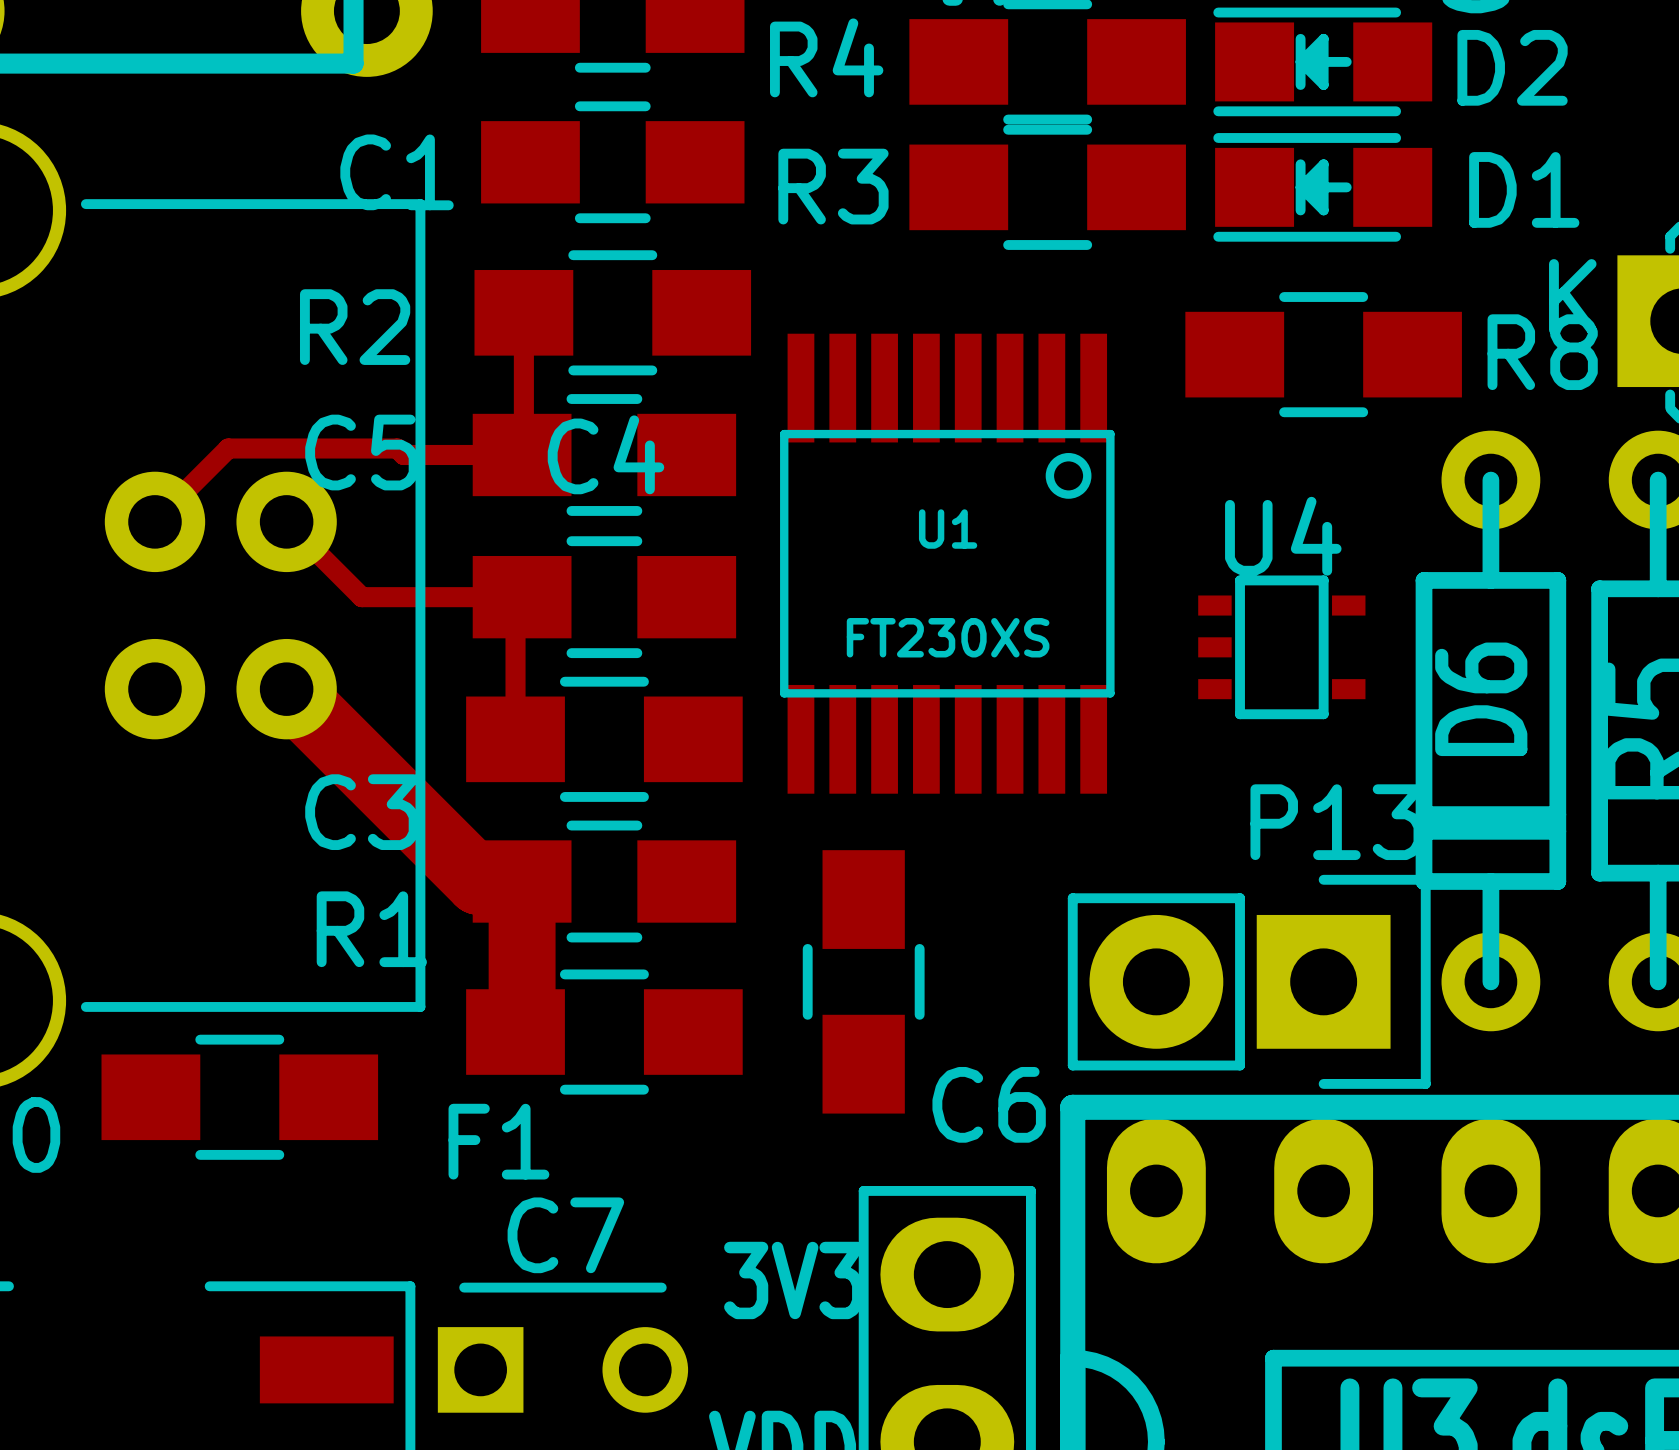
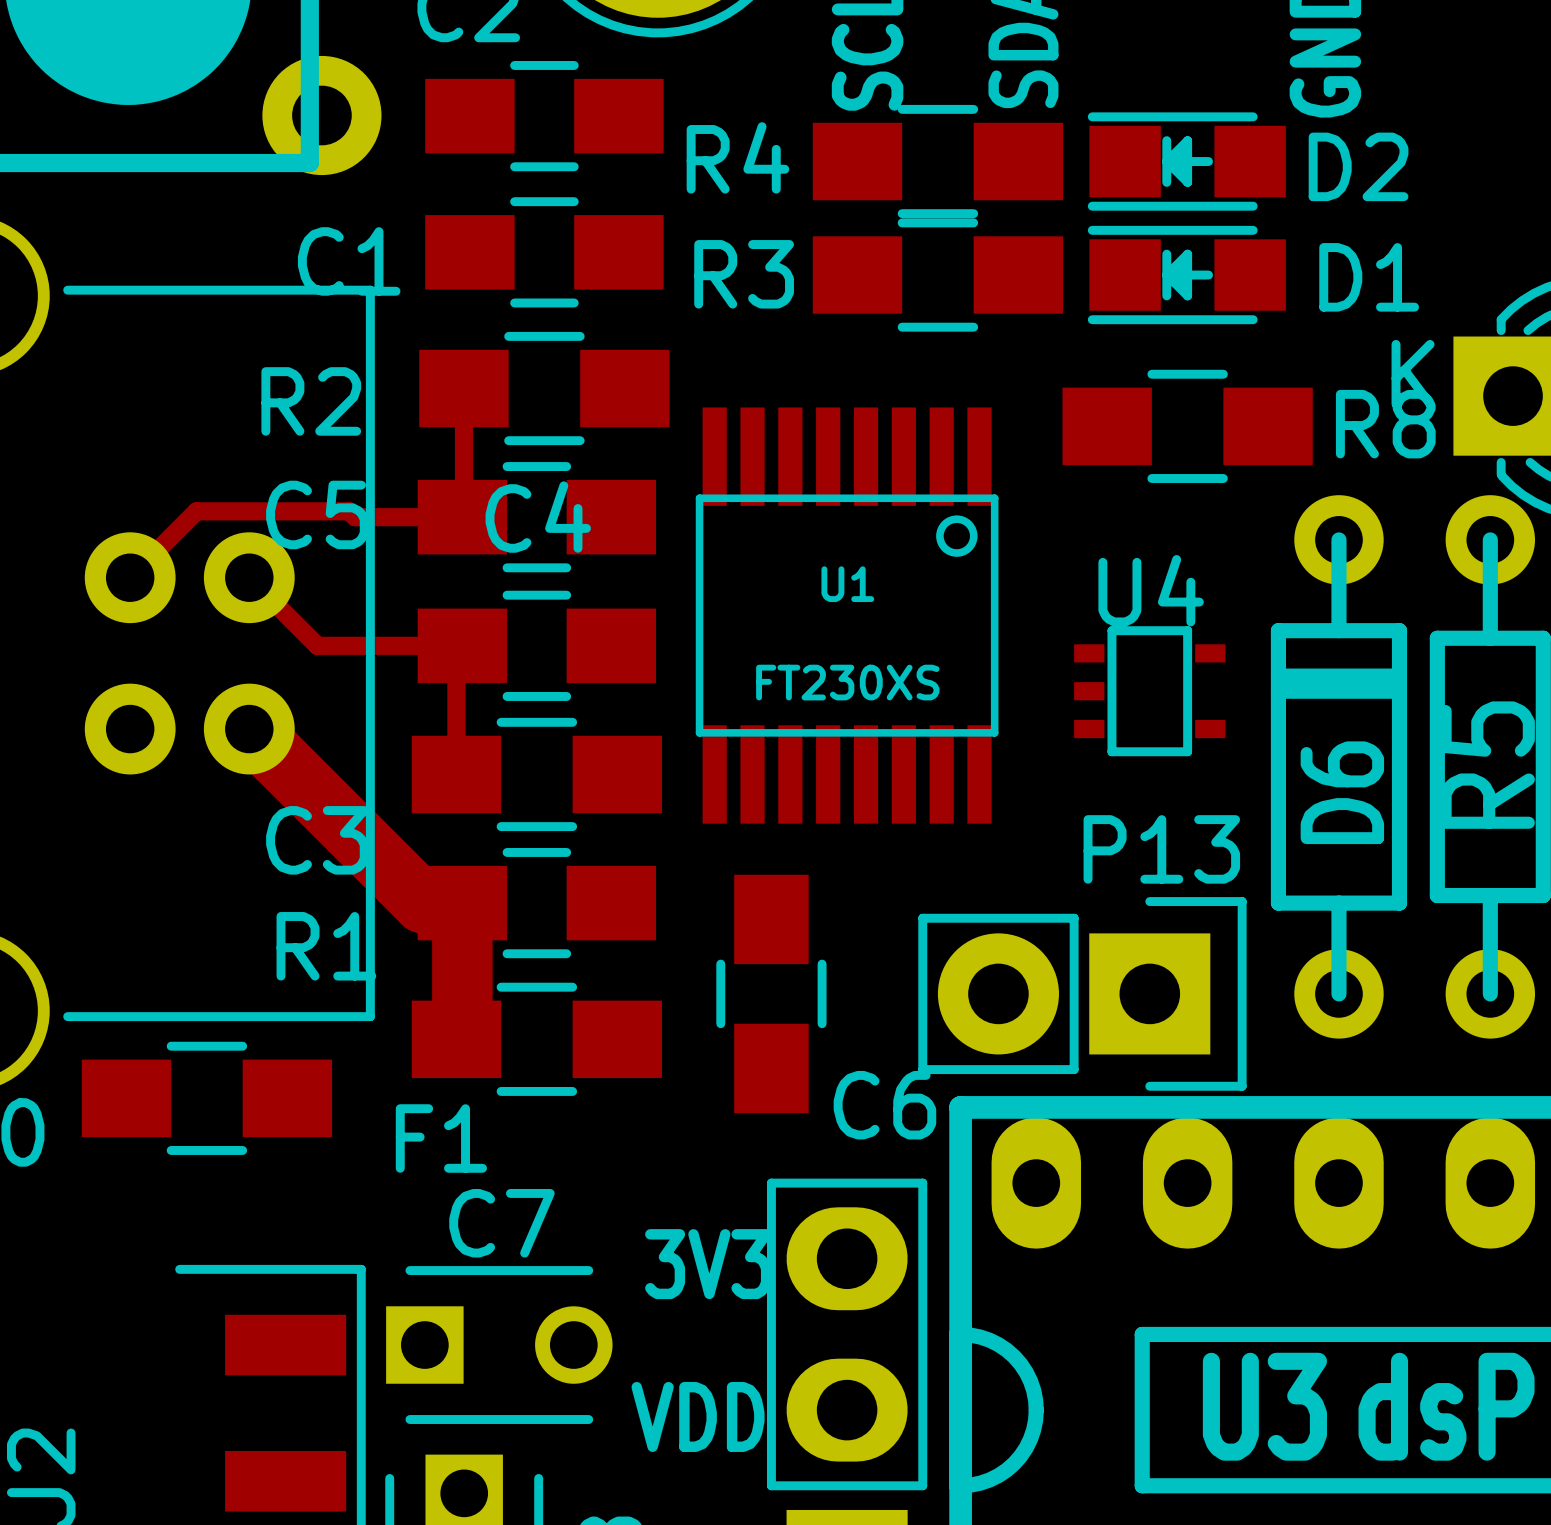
D6 rotation: 0° (1490, 730) -> 180° (1338, 766)
P13 position: (1249, 981) -> (1082, 993)

